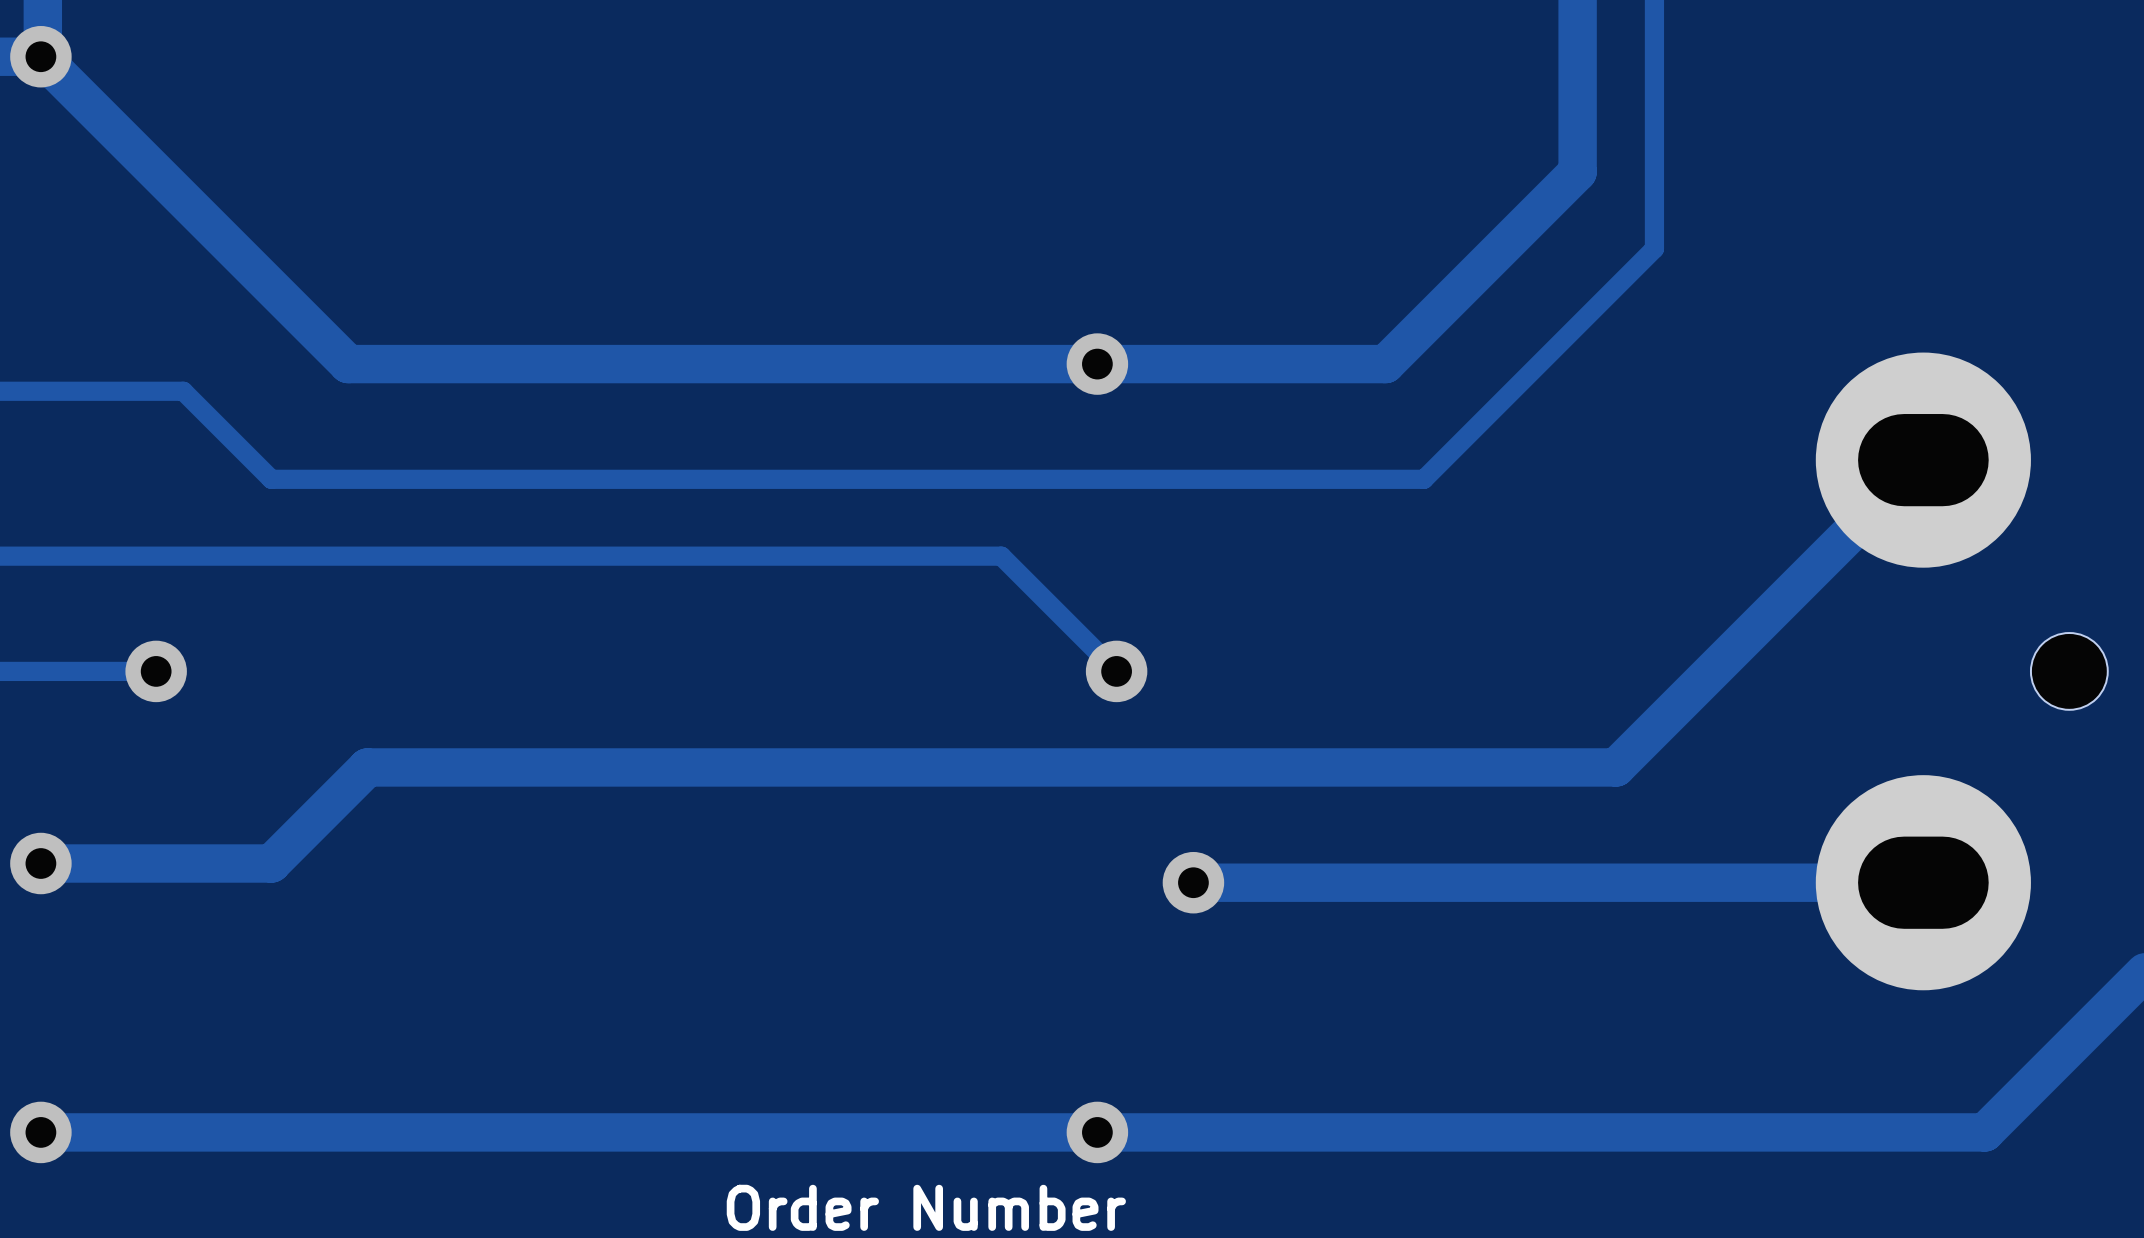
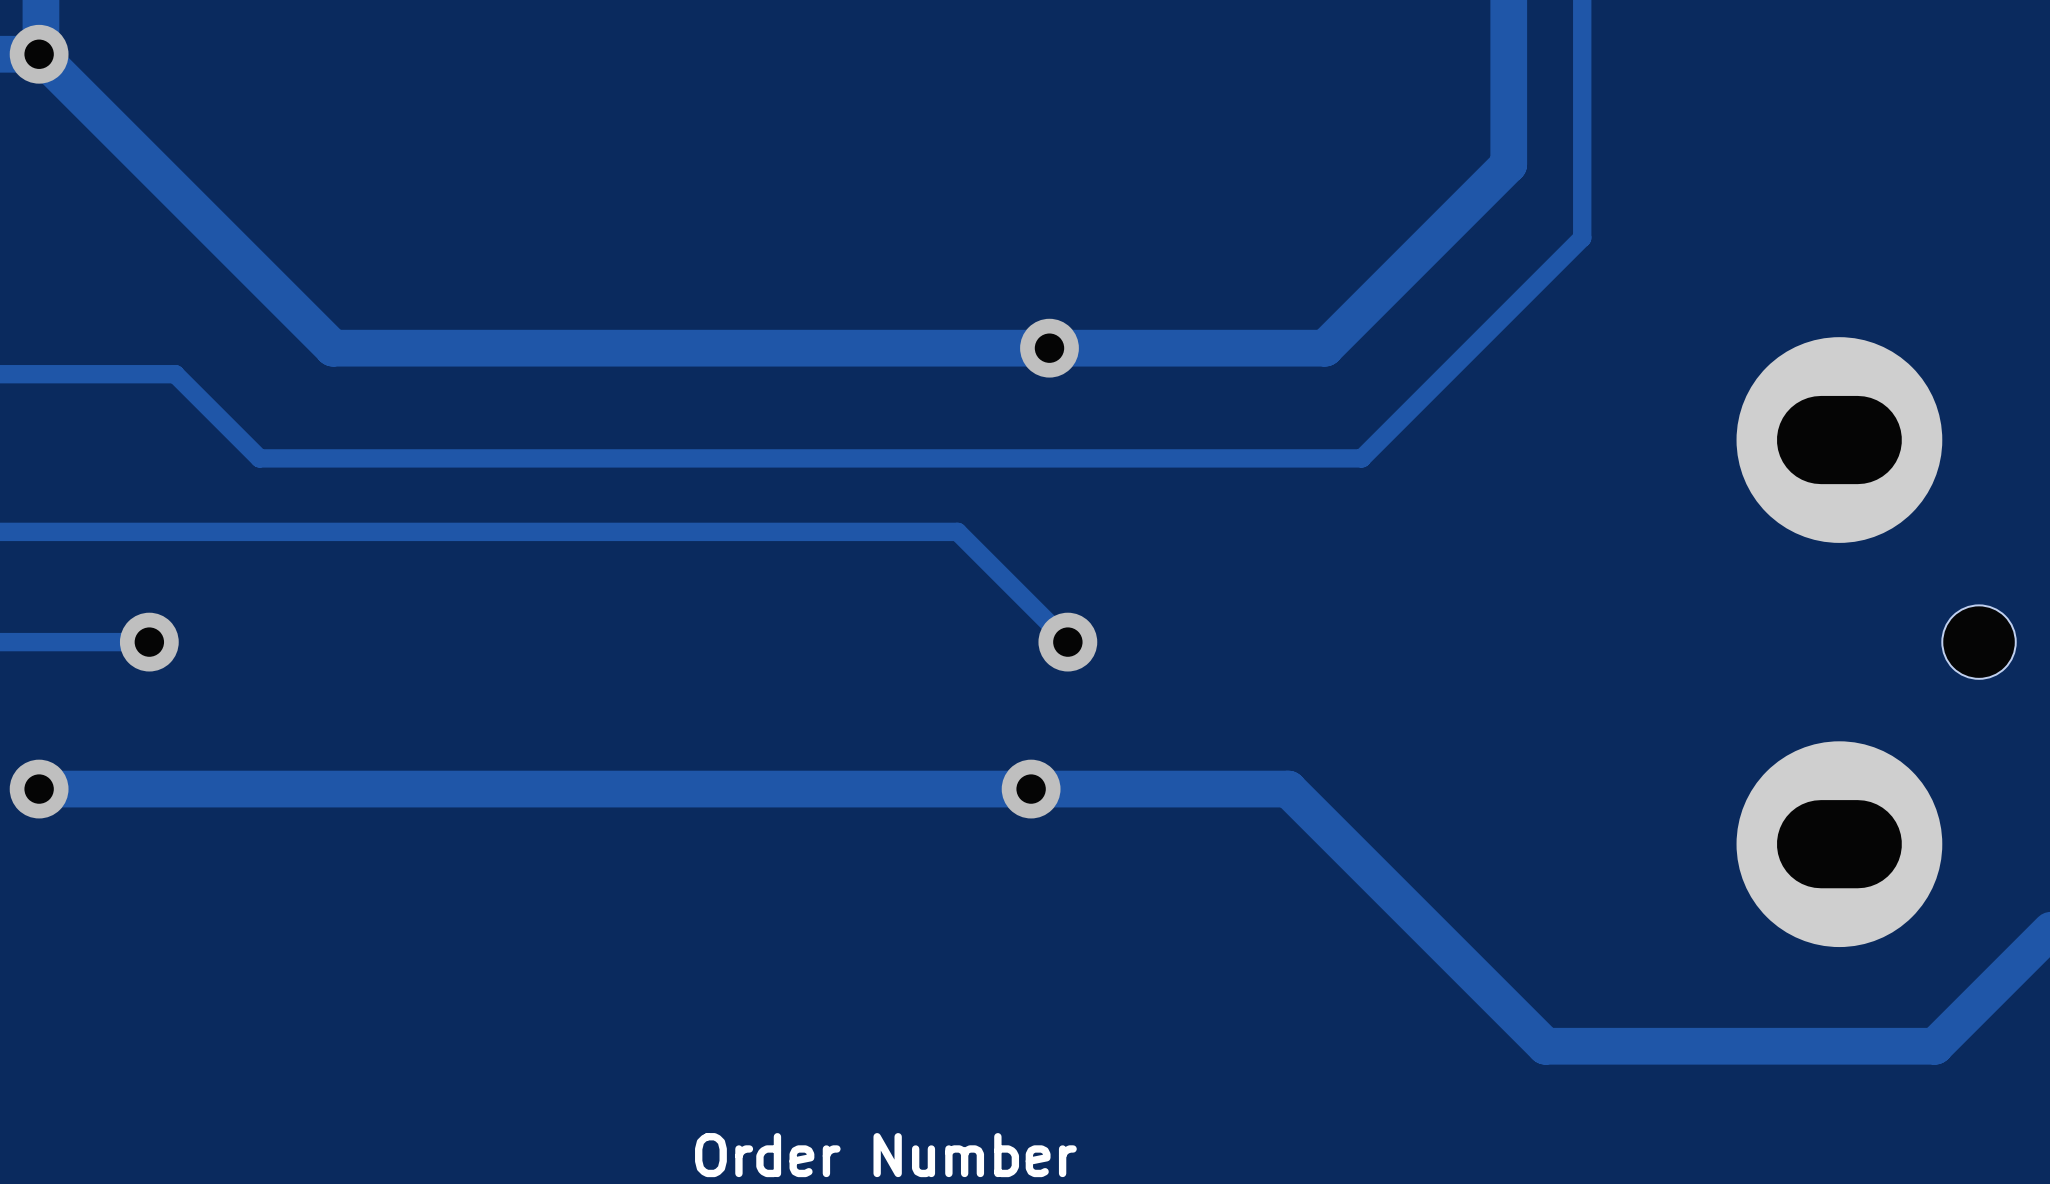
track: (1923, 460) (1616, 767) (367, 767) (271, 863) (40, 863) -> none
via position: (40, 863) -> (39, 789)
via position: (1193, 882) -> (1031, 789)
track: (1923, 882) (1193, 882) -> none
track: (2023, 1094) (1984, 1132) (40, 1132) -> (1934, 1046) (1545, 1046) (1288, 789) (39, 789)
via: (40, 1132) -> none
via: (1097, 1132) -> none

